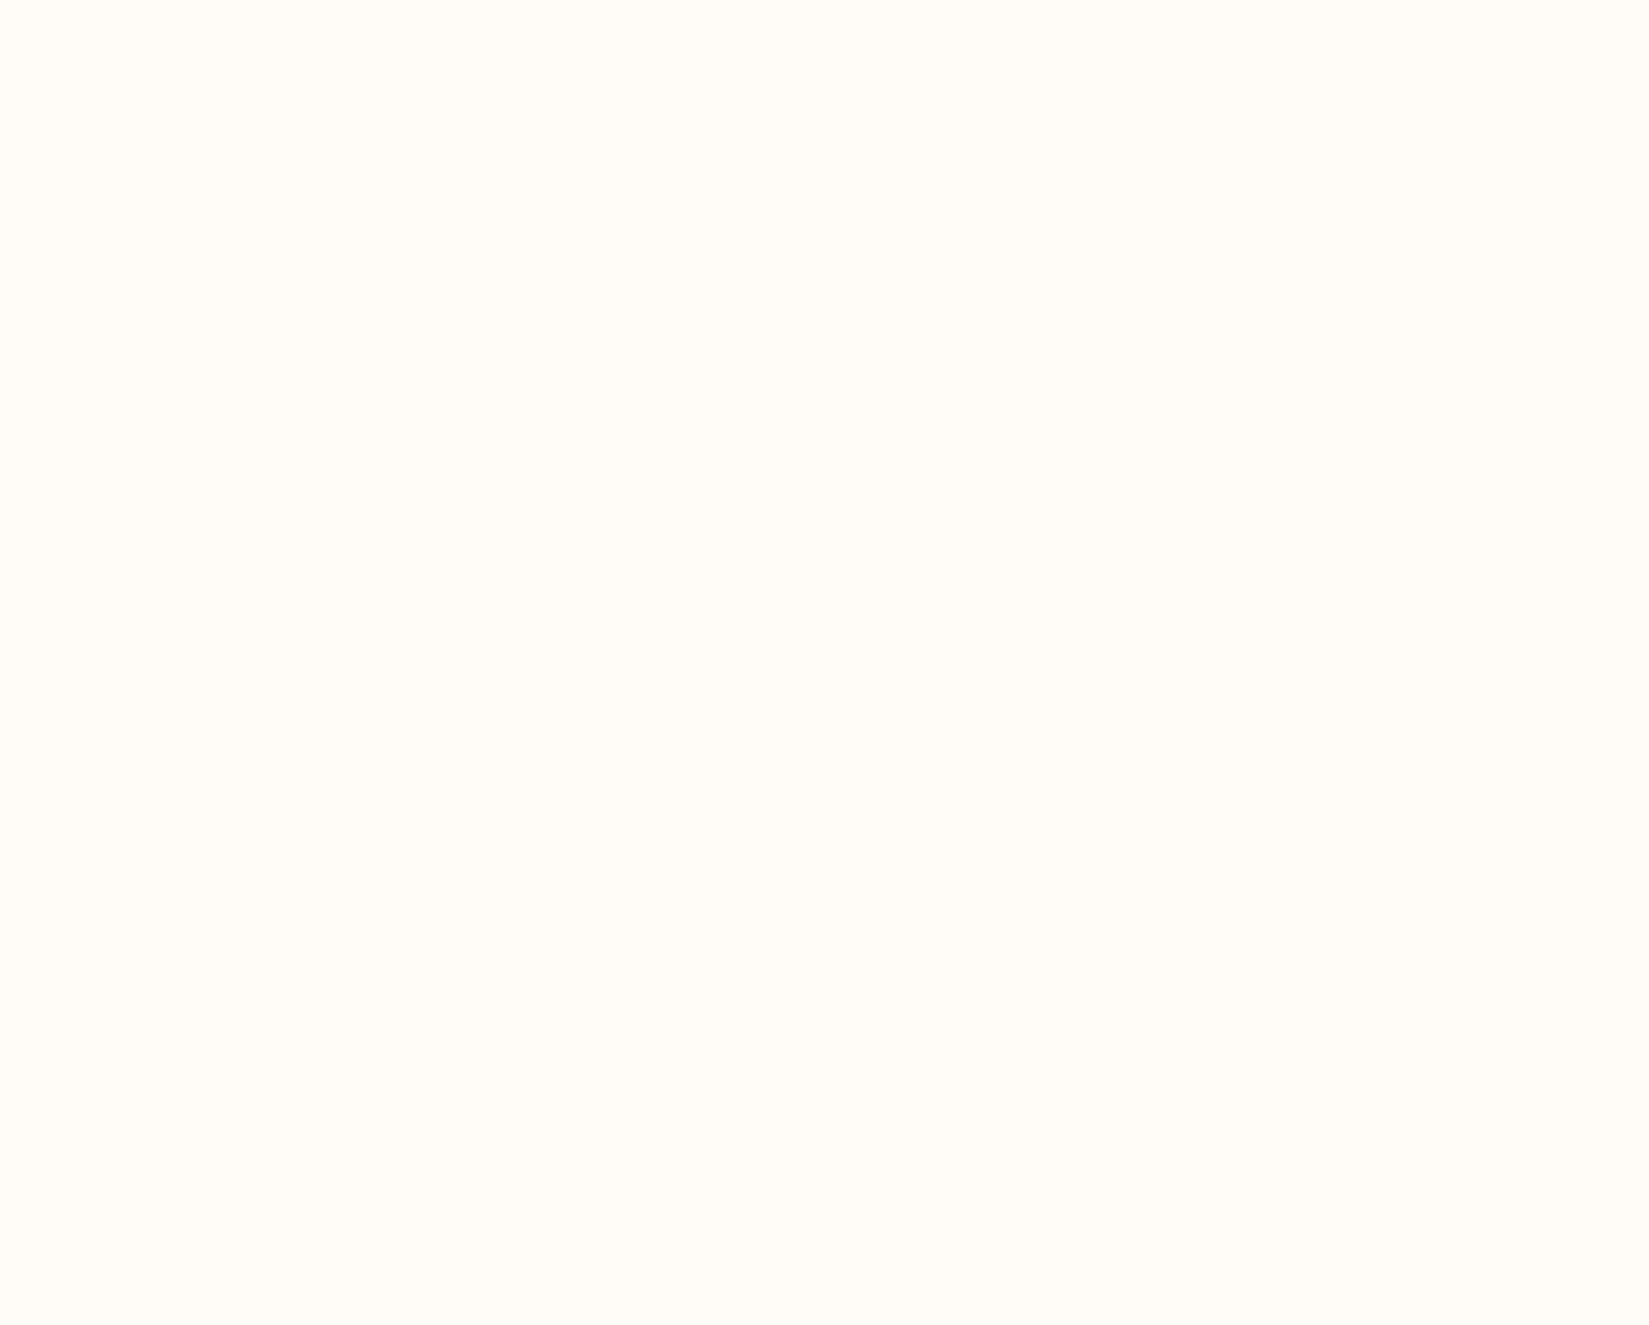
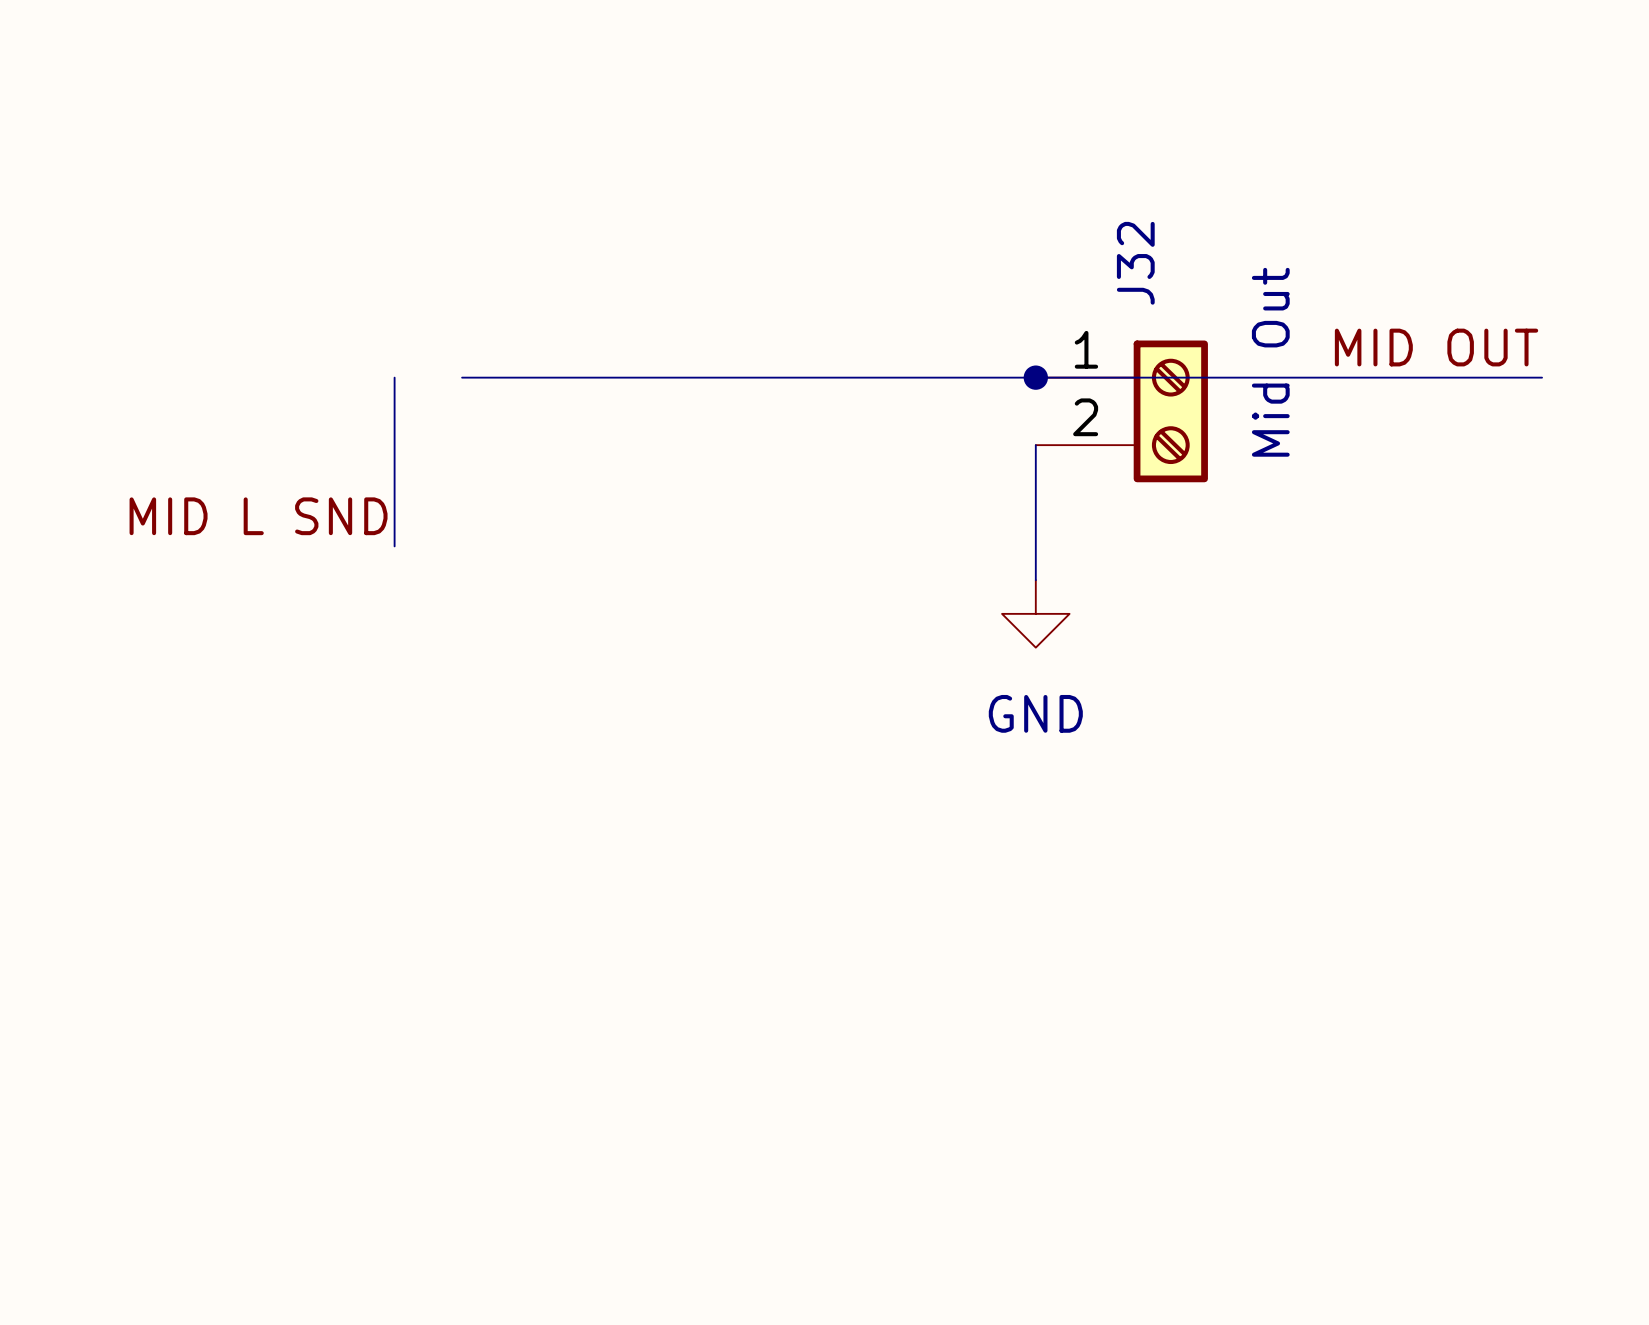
label: none -> MID OUT (1436, 347)
wire: none -> (394, 377) (394, 546)
wire: none -> (462, 377) (1542, 377)
junction: none -> (1035, 377)
J32: none -> Mid Out (1121, 411)
wire: none -> (1035, 445) (1035, 580)
label: none -> MID L SND (258, 516)
power symbol: none -> GND (1035, 613)

